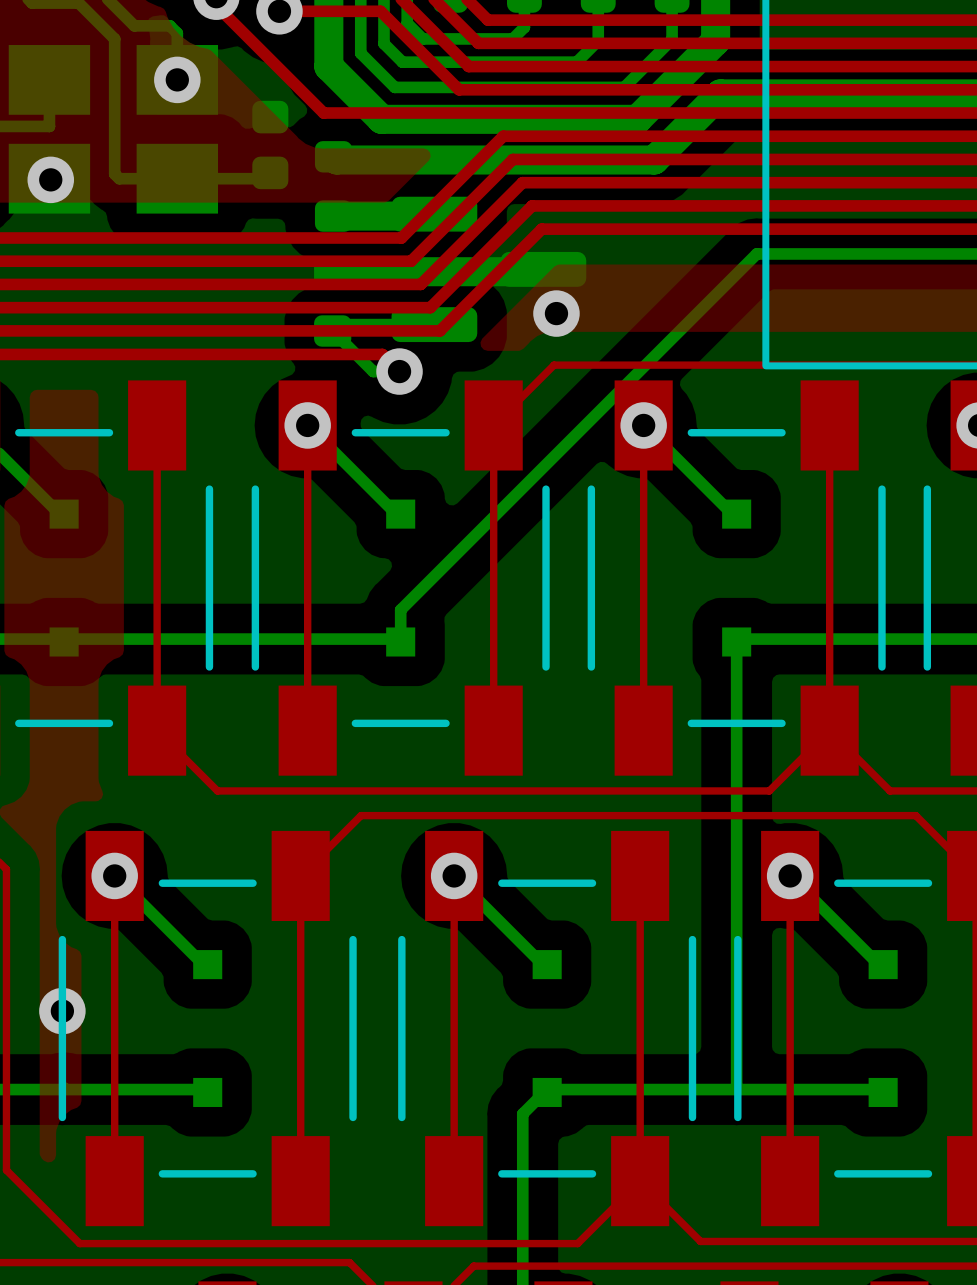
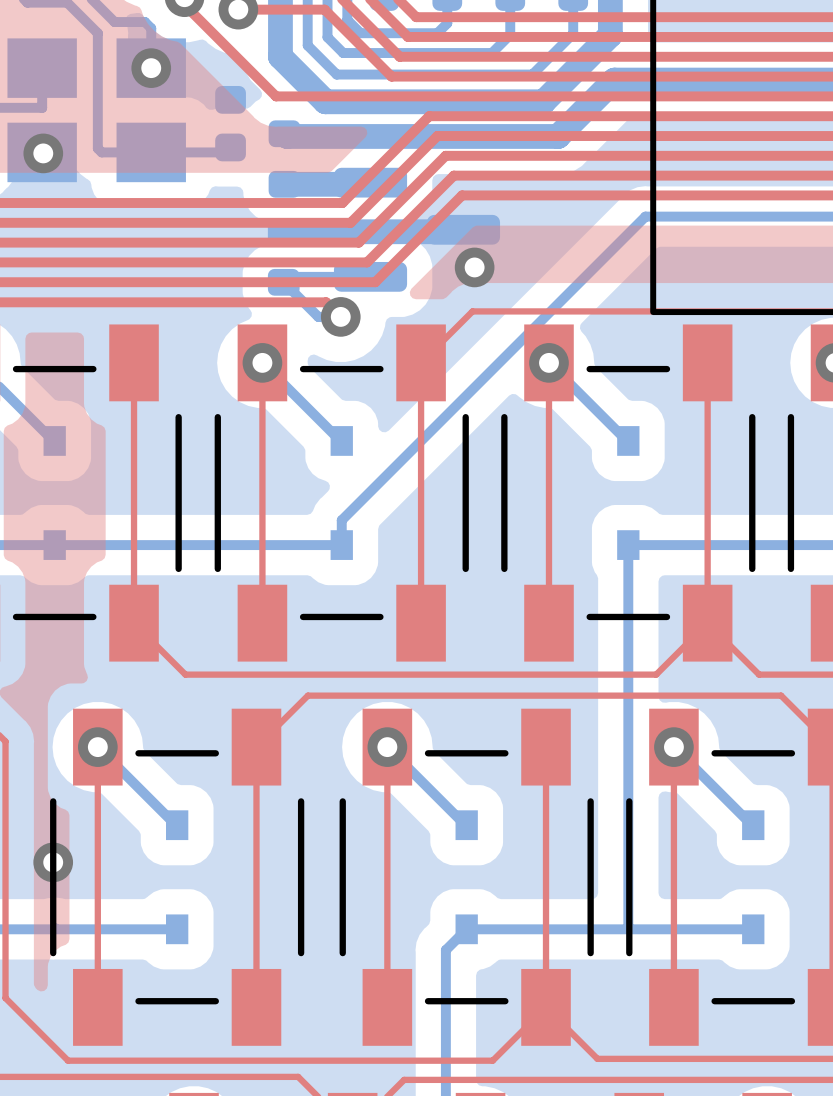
part footprint: [49, 499, 79, 657] -> [43, 426, 66, 560]
part footprint: [386, 499, 416, 657] -> [330, 426, 353, 560]
part footprint: [722, 499, 752, 657] -> [617, 426, 640, 560]
part footprint: [193, 950, 223, 1108] -> [166, 810, 189, 945]
part footprint: [532, 950, 562, 1108] -> [455, 810, 478, 945]
part footprint: [868, 950, 898, 1108] -> [742, 810, 765, 945]

